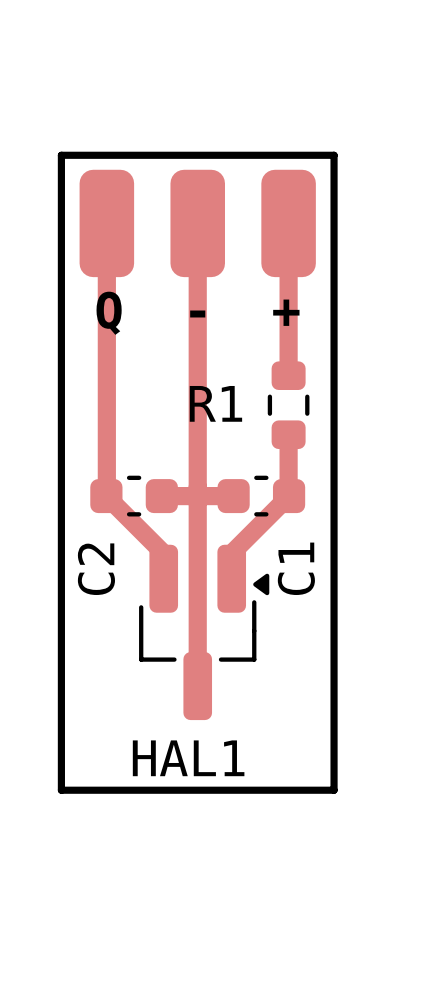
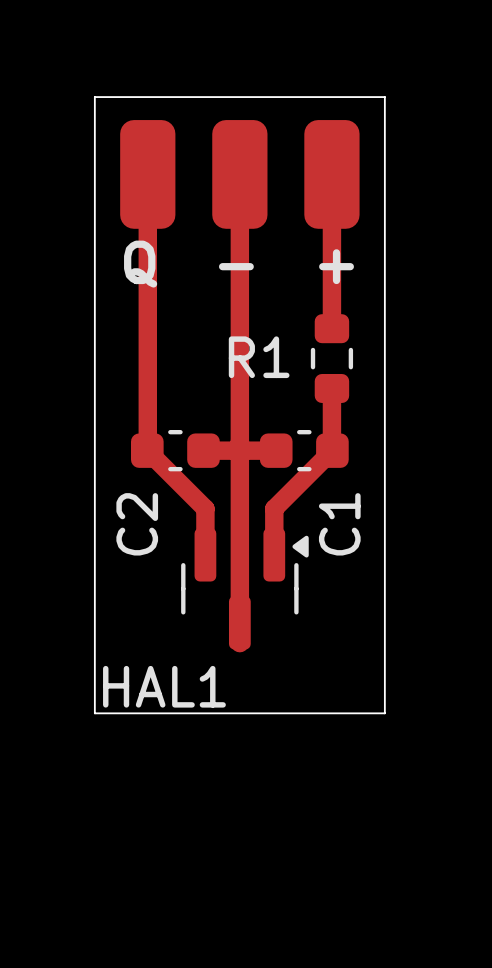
board edge: (61, 155) (334, 155) (334, 790) (61, 790) (61, 155) -> (94, 97) (94, 713) (384, 713) (384, 97) (94, 97)
HAL1 footprint: [139, 544, 270, 721] -> [181, 528, 309, 650]
HAL1 name position: HAL1 (188, 758) -> HAL1 (164, 686)

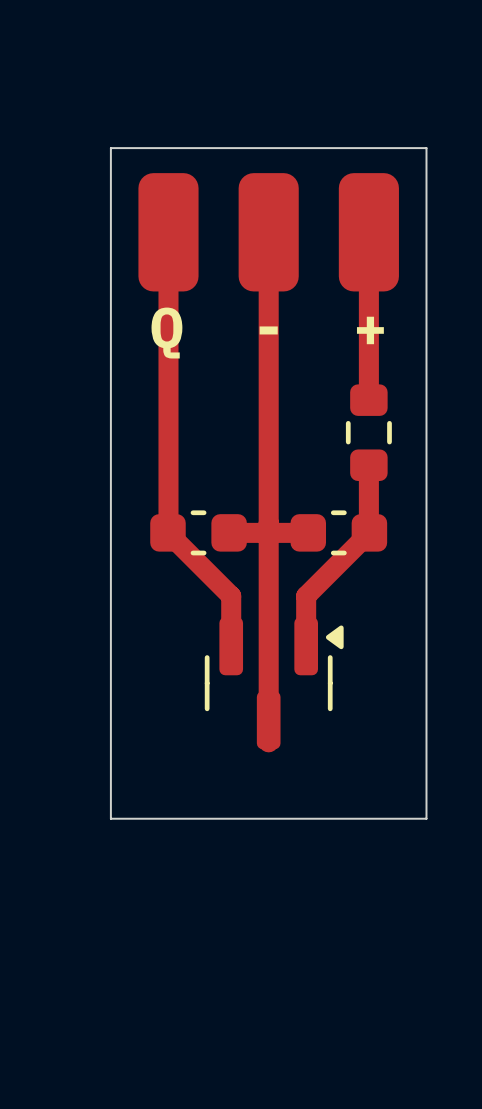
R1 name: R1 (259, 357) -> none
C2 name: C2 (137, 524) -> none
C1 name: C1 (339, 524) -> none
HAL1 name: HAL1 (164, 686) -> none

